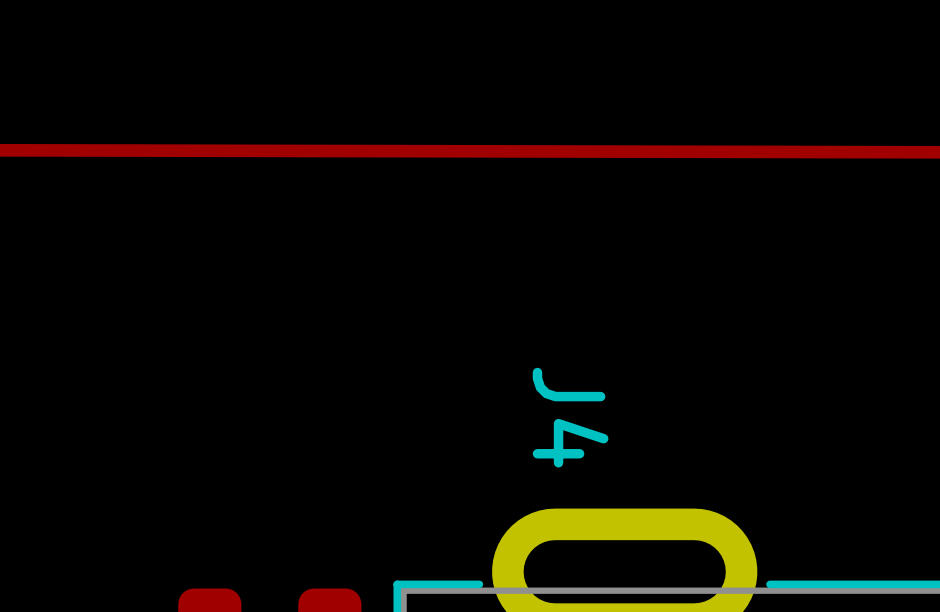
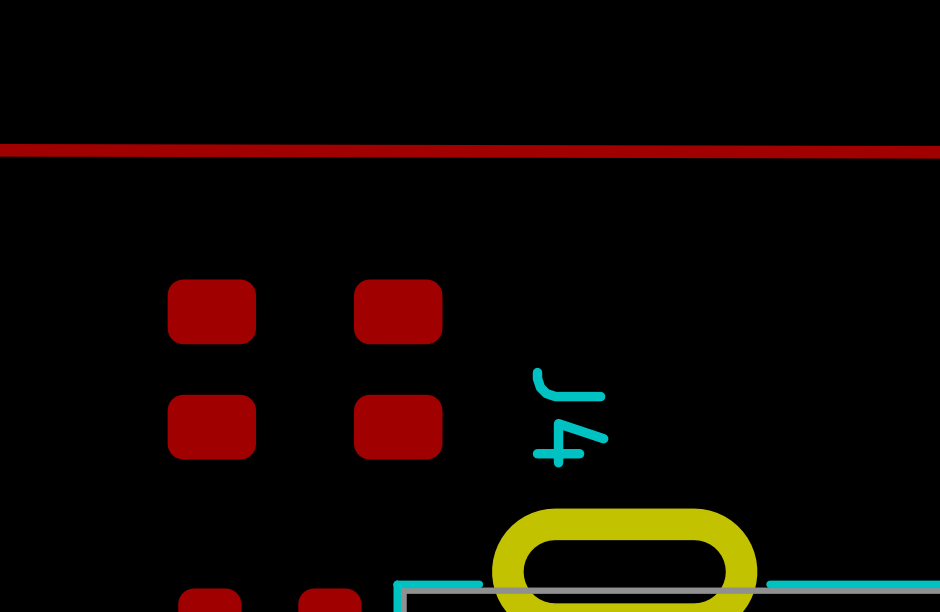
part: none -> (211, 369)
part: none -> (398, 369)

